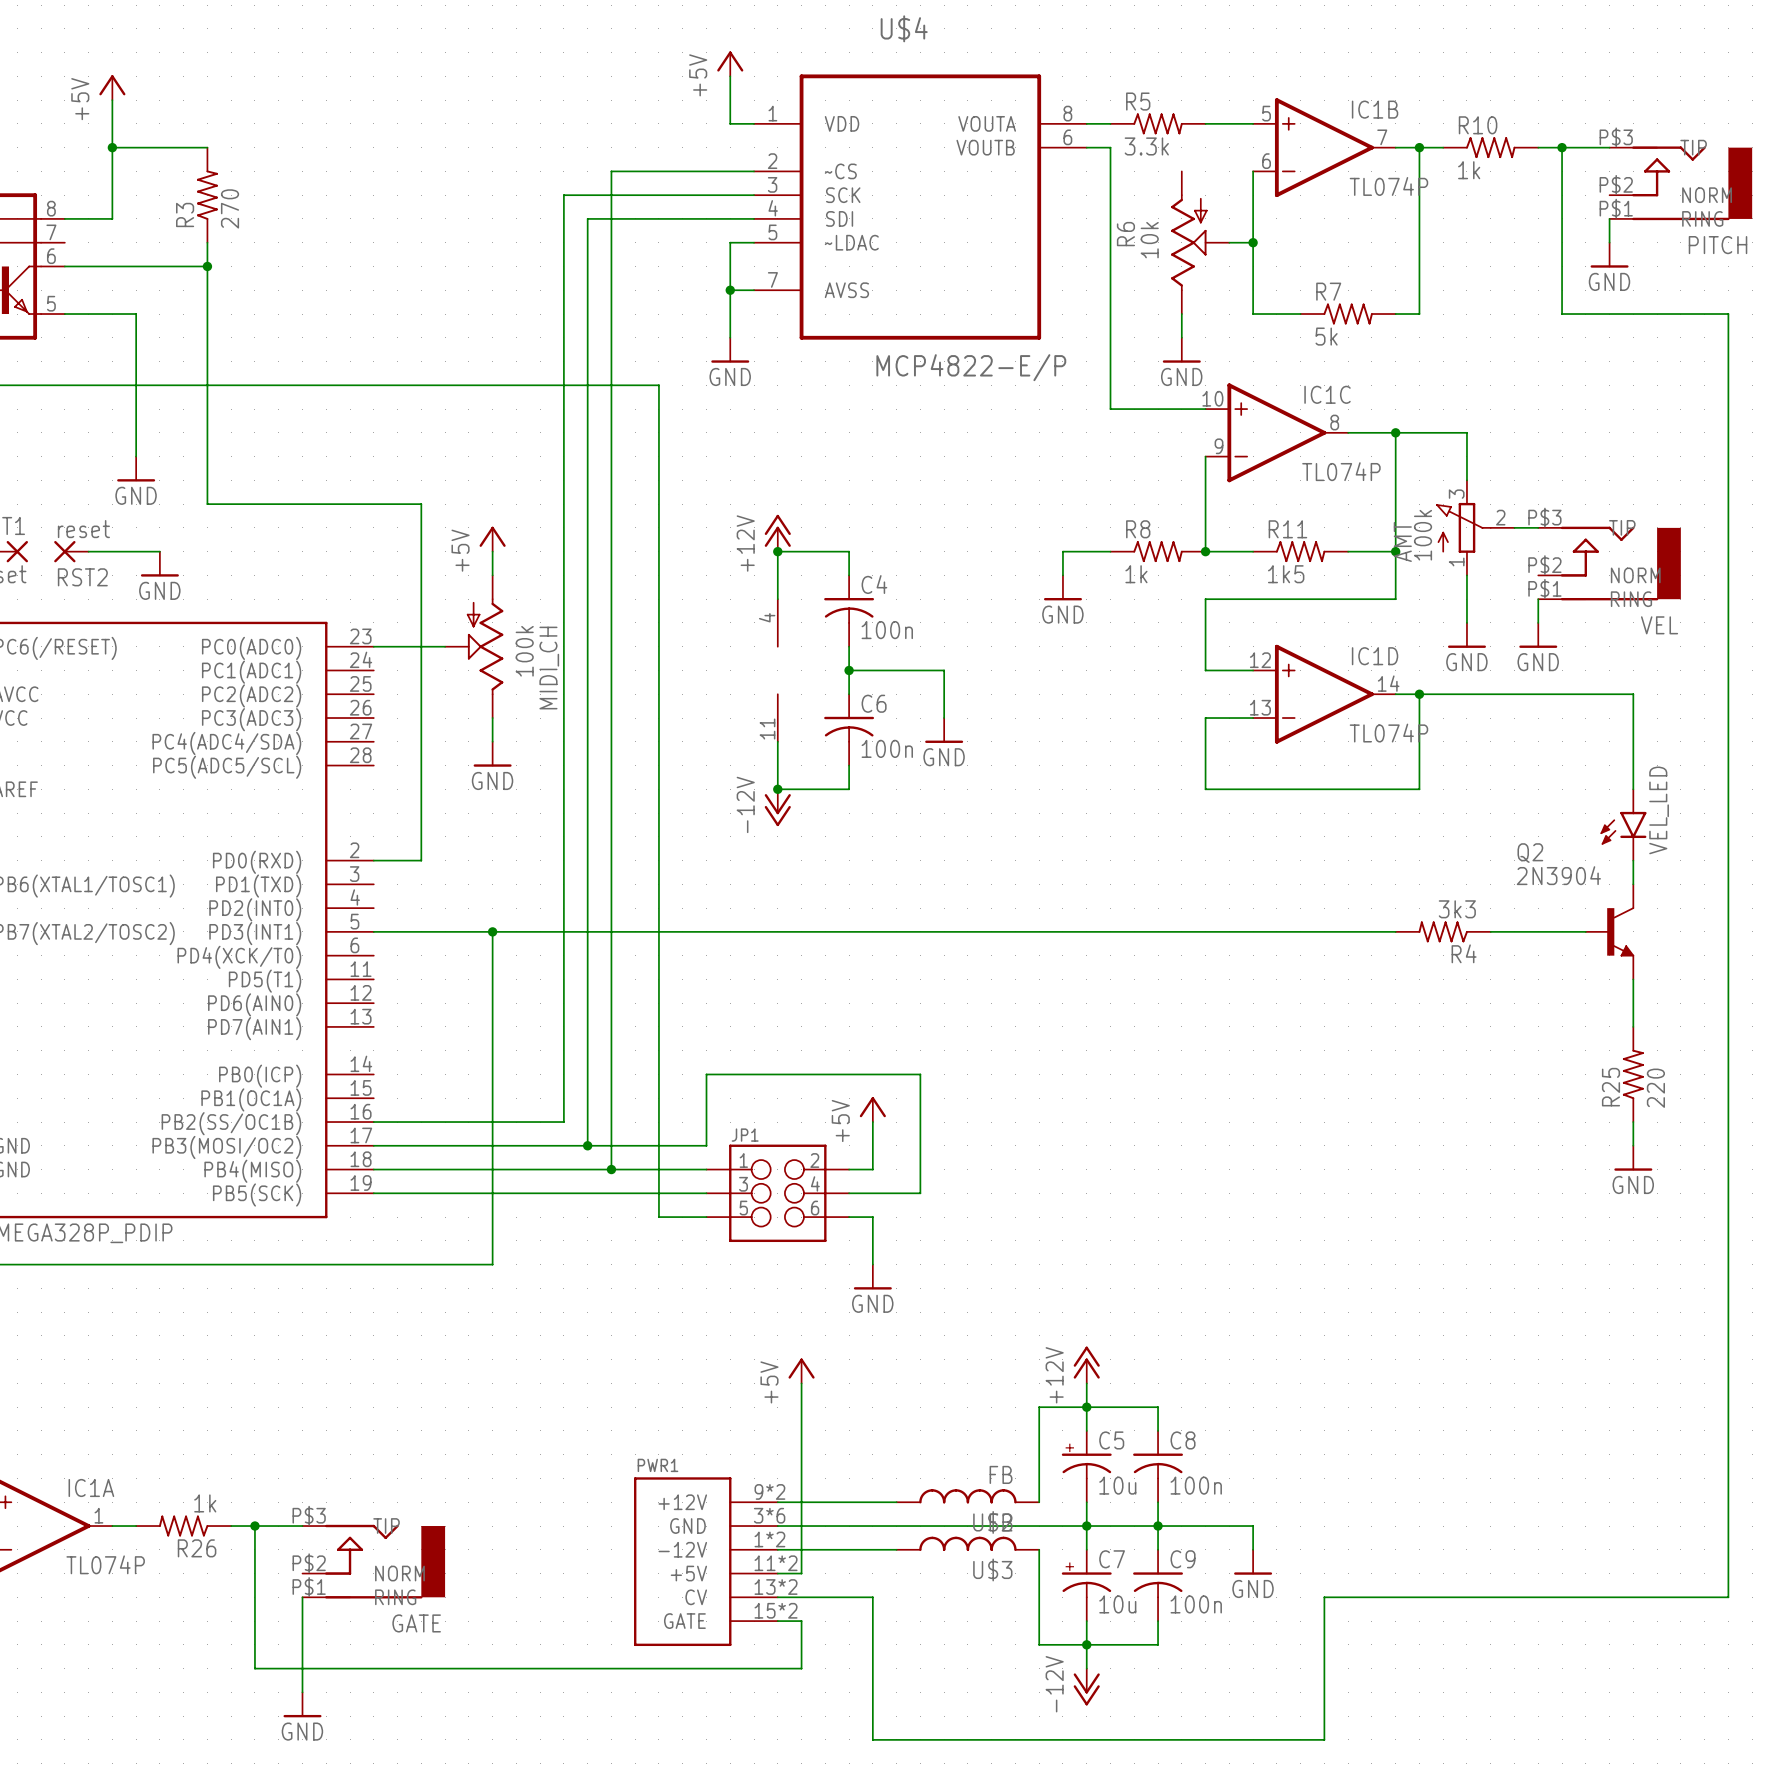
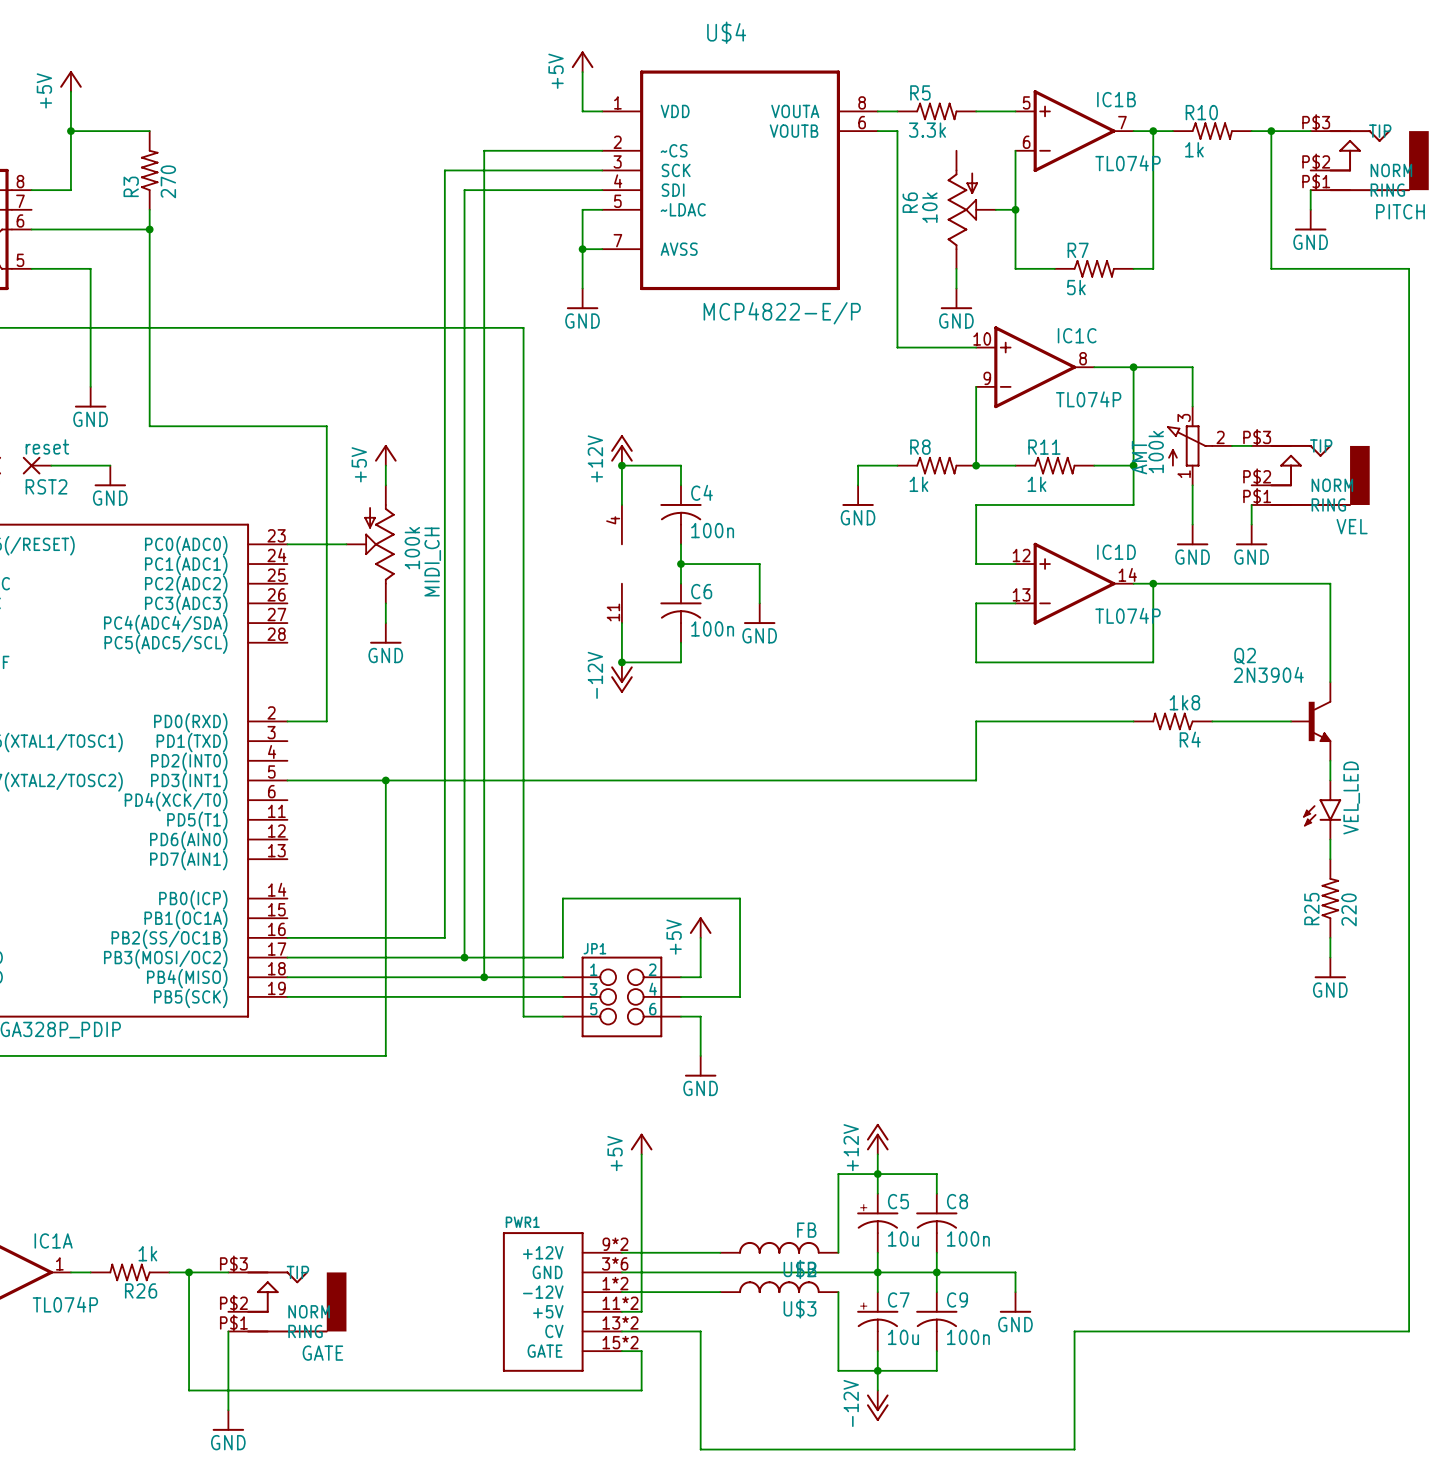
R11 value: 1k5 (1286, 574) -> 1k (1037, 484)
VEL_LED position: (1623, 824) -> (1322, 810)
wire: (1633, 860) (1633, 884) -> (1330, 760) (1330, 780)
R4 value: 3k3 (1457, 909) -> 1k8 (1184, 702)
wire: (1205, 931) (1395, 931) -> (976, 780) (976, 721) (1133, 721)
R4 position: (1443, 931) -> (1172, 721)
wire: (1490, 931) (1585, 931) -> (1212, 721) (1291, 721)
Q2 position: (1609, 931) -> (1310, 721)

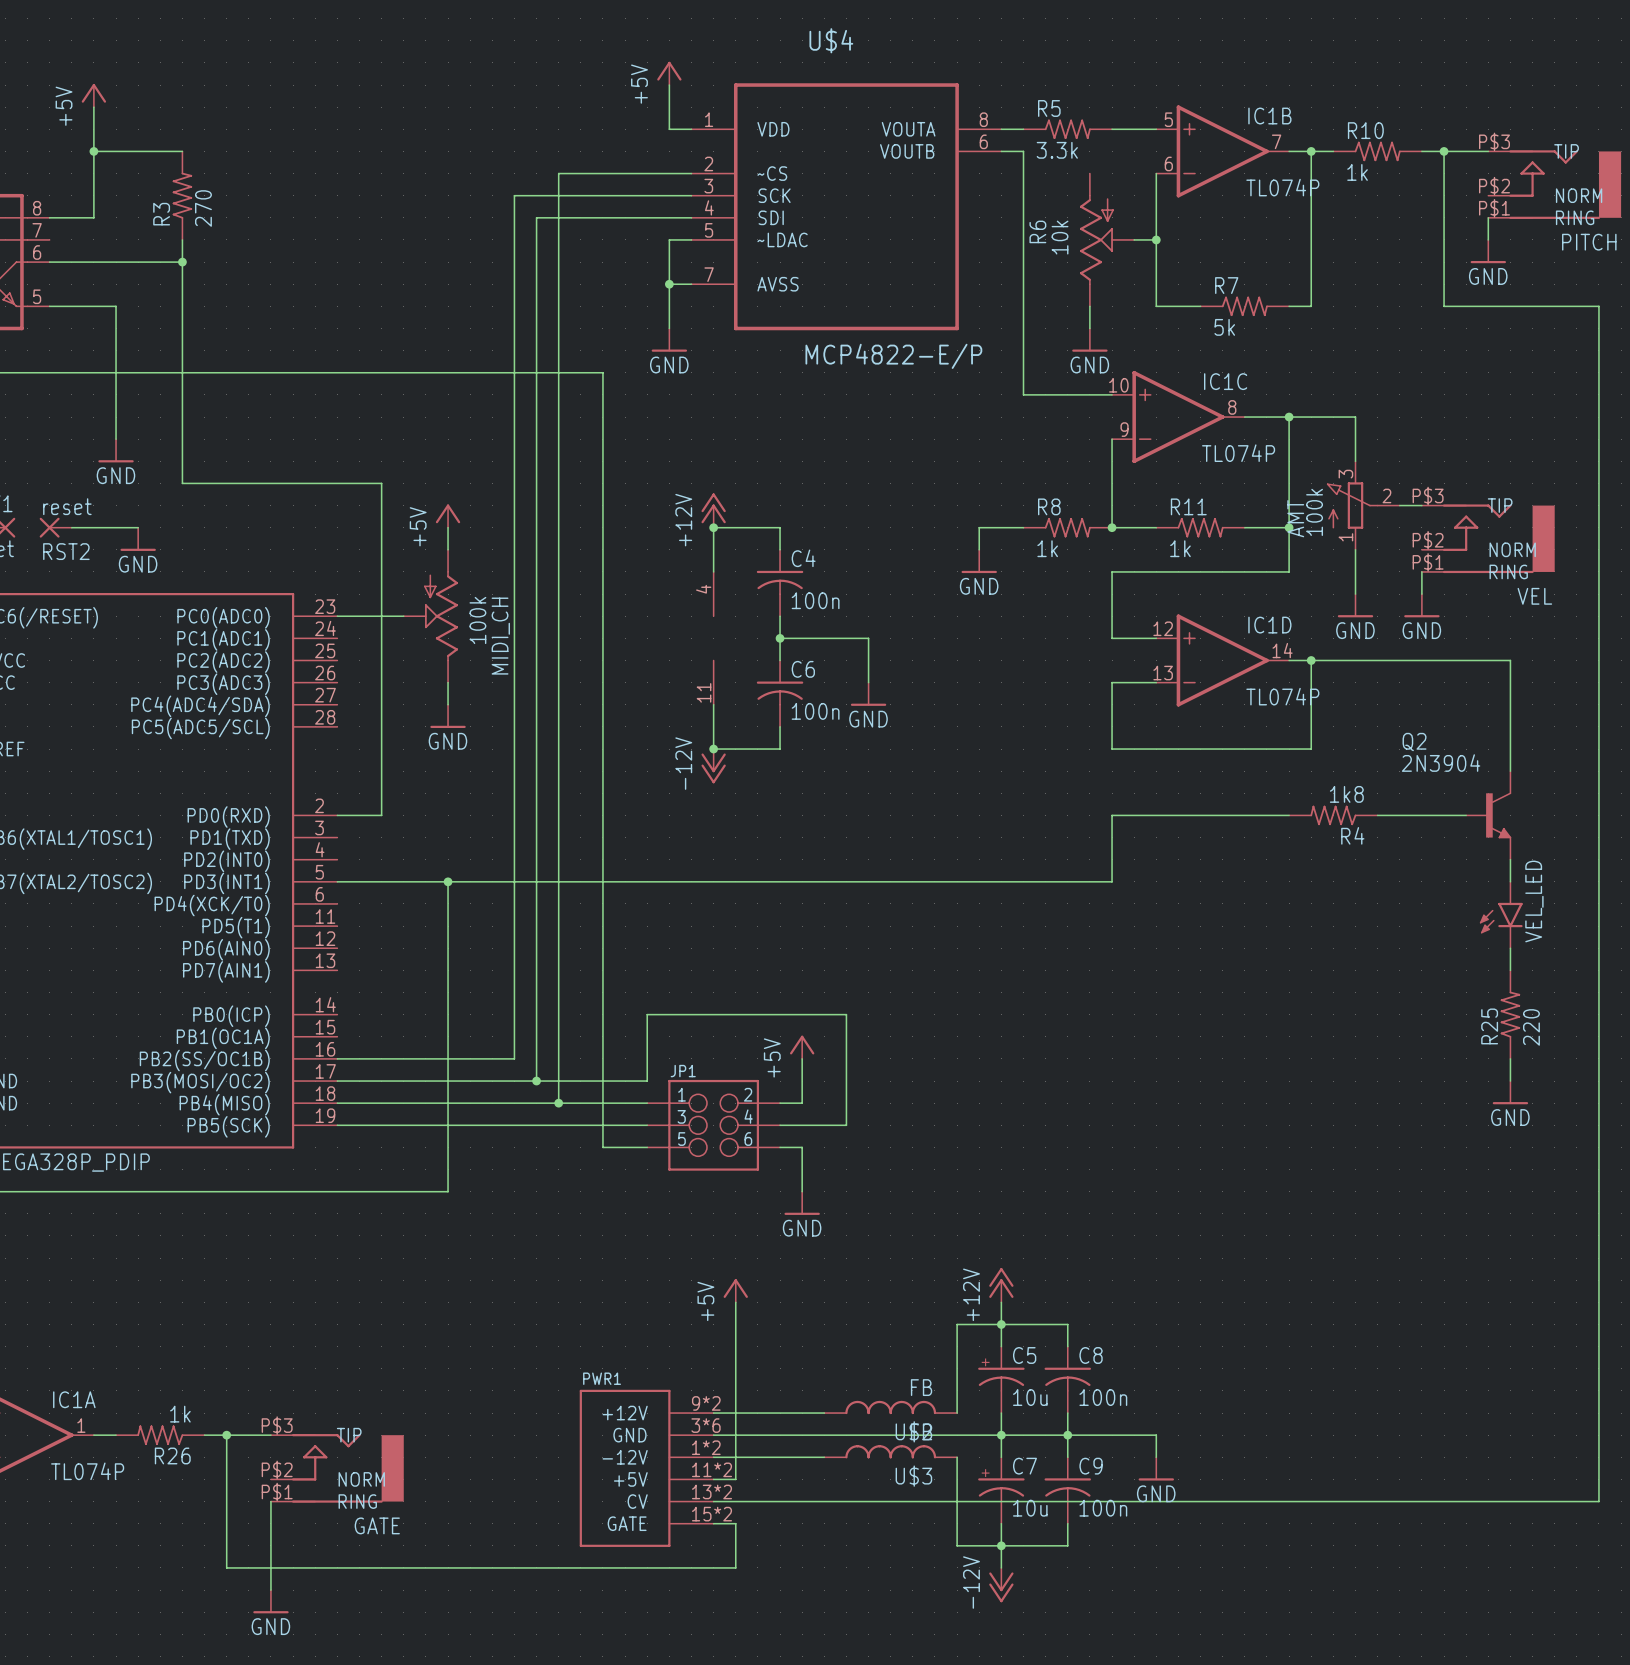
wire: (700, 1331) (700, 1449) (1074, 1449) (1074, 1331) -> (802, 1501) (1222, 1501)

